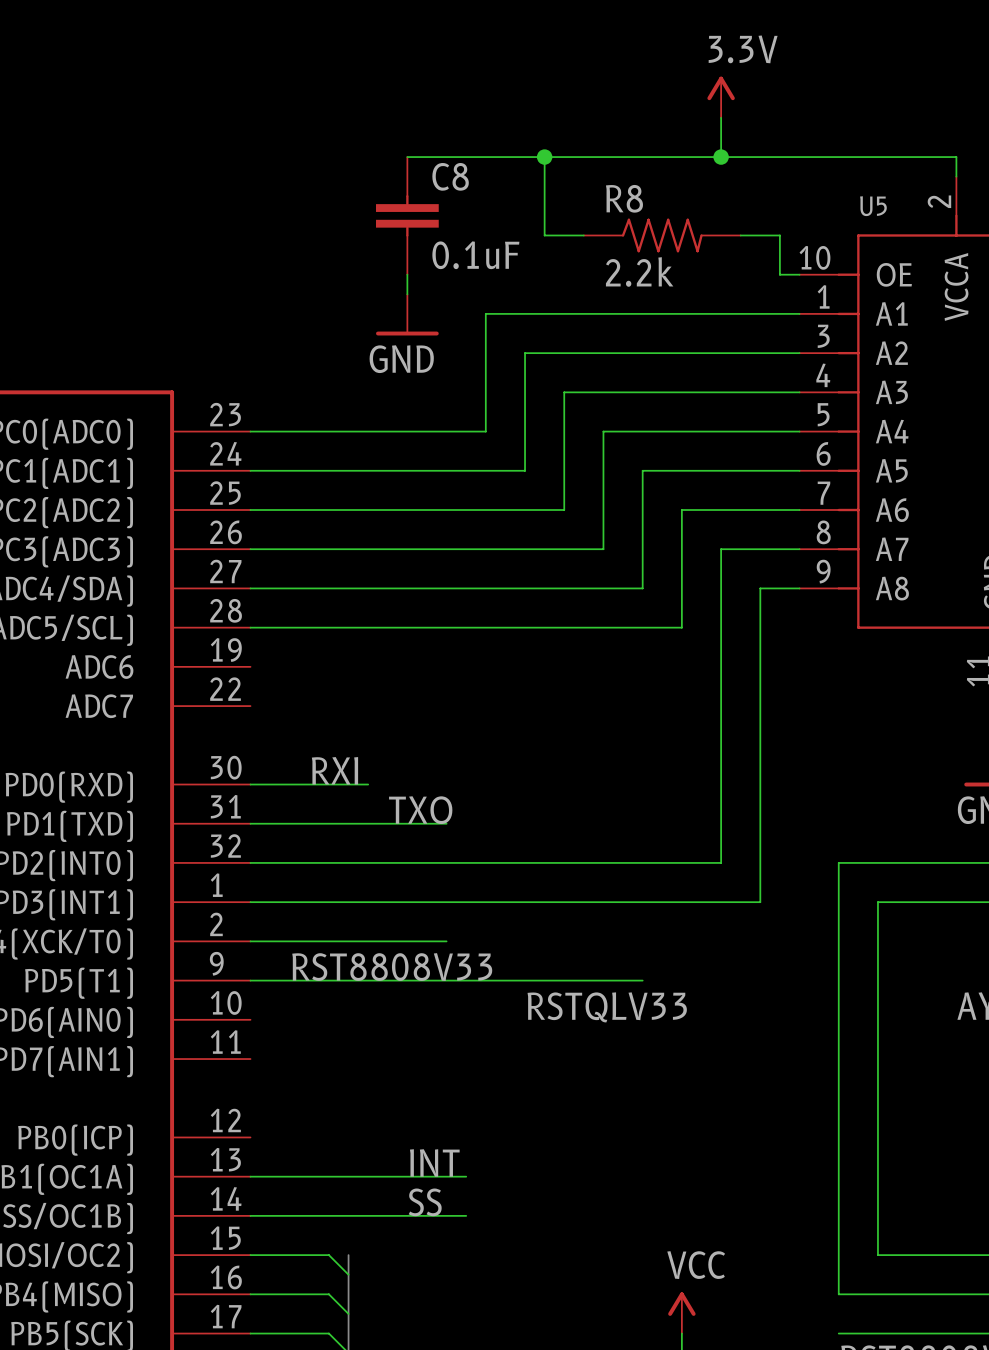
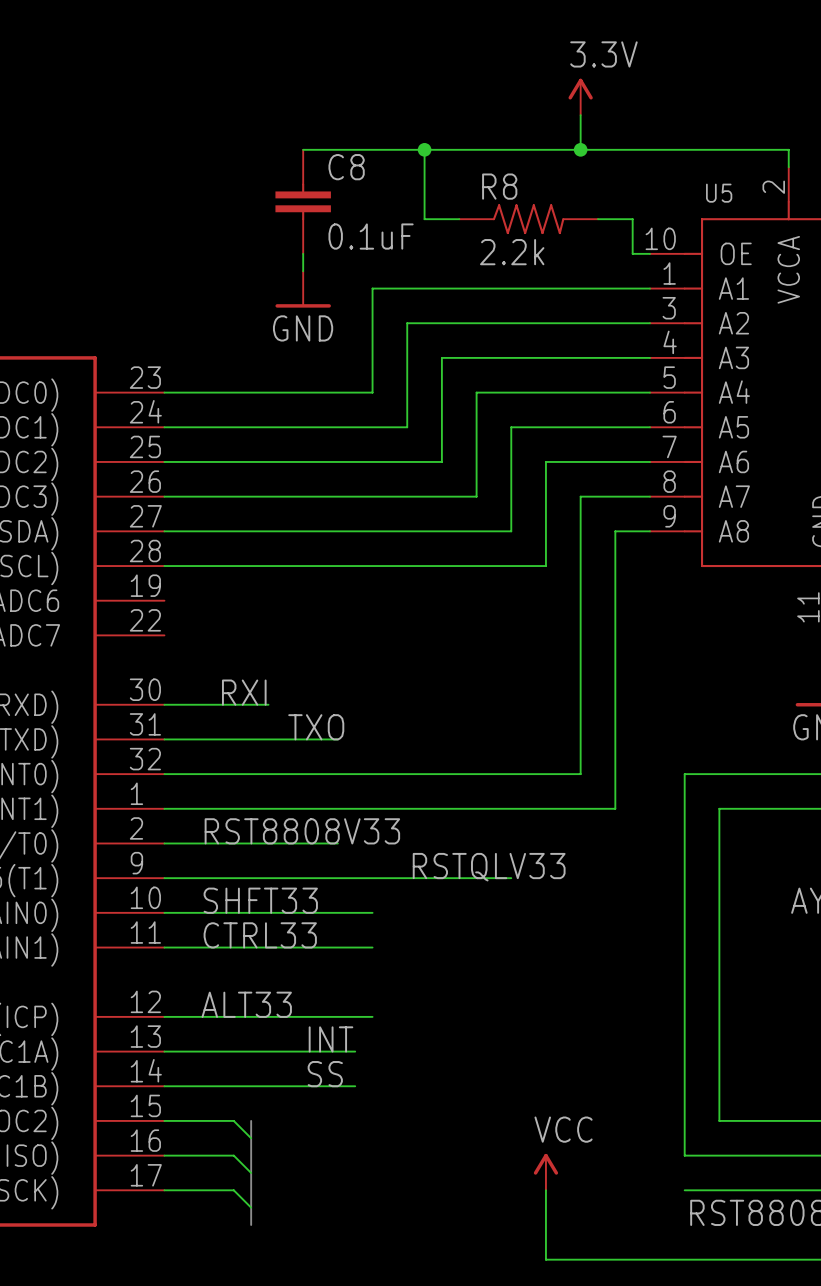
label position: RST8808V33 (392, 967) -> RST8808V33 (302, 831)
label: none -> SHFT33 (260, 900)
label position: RSTQLV33 (607, 1007) -> RSTQLV33 (489, 867)
wire: none -> (164, 912) (372, 912)
label: none -> CTRL33 (260, 935)
wire: none -> (164, 947) (372, 947)
label: none -> ALT33 (246, 1004)
wire: none -> (164, 1016) (372, 1016)

